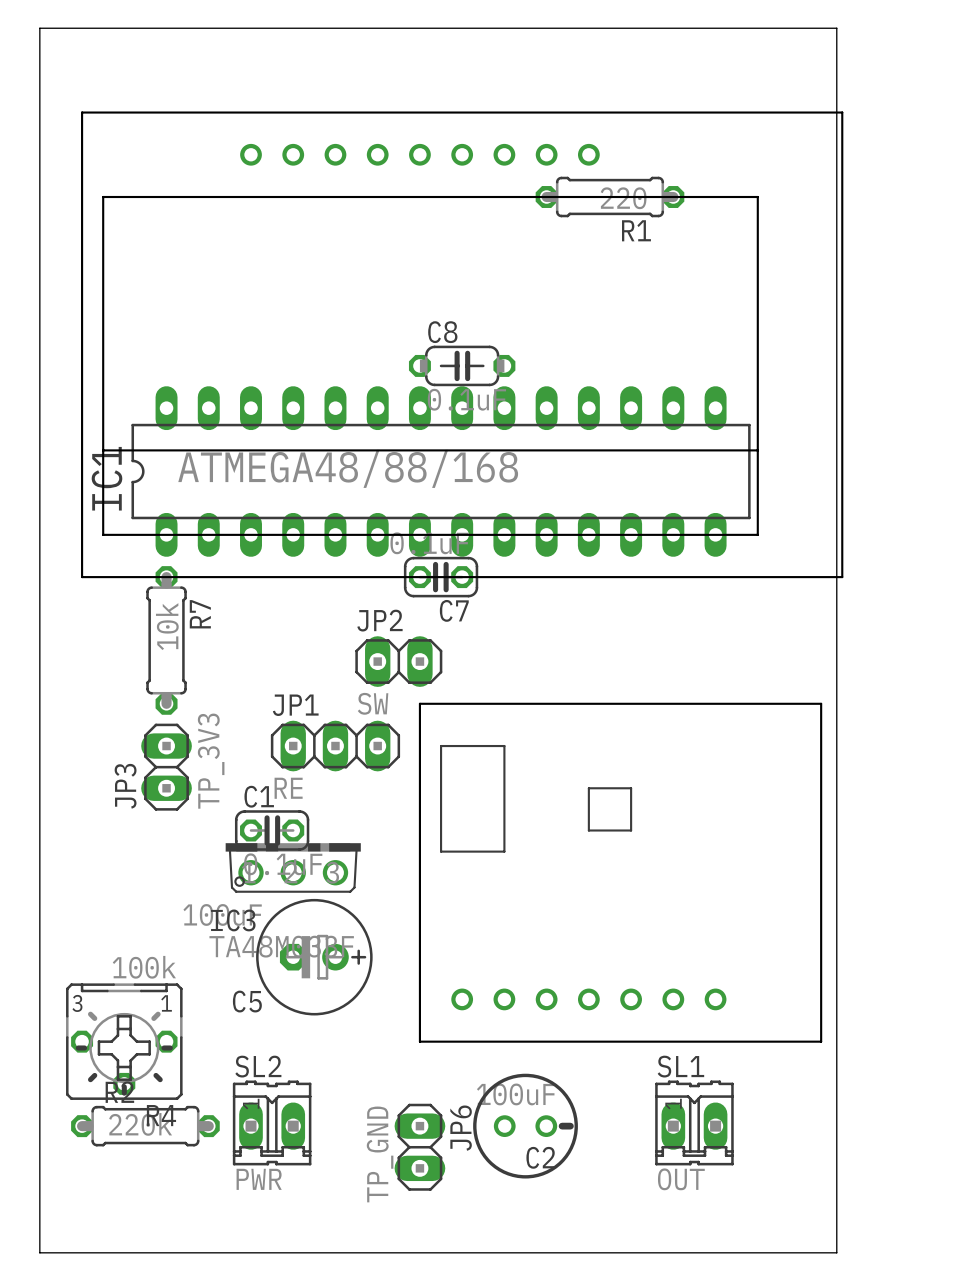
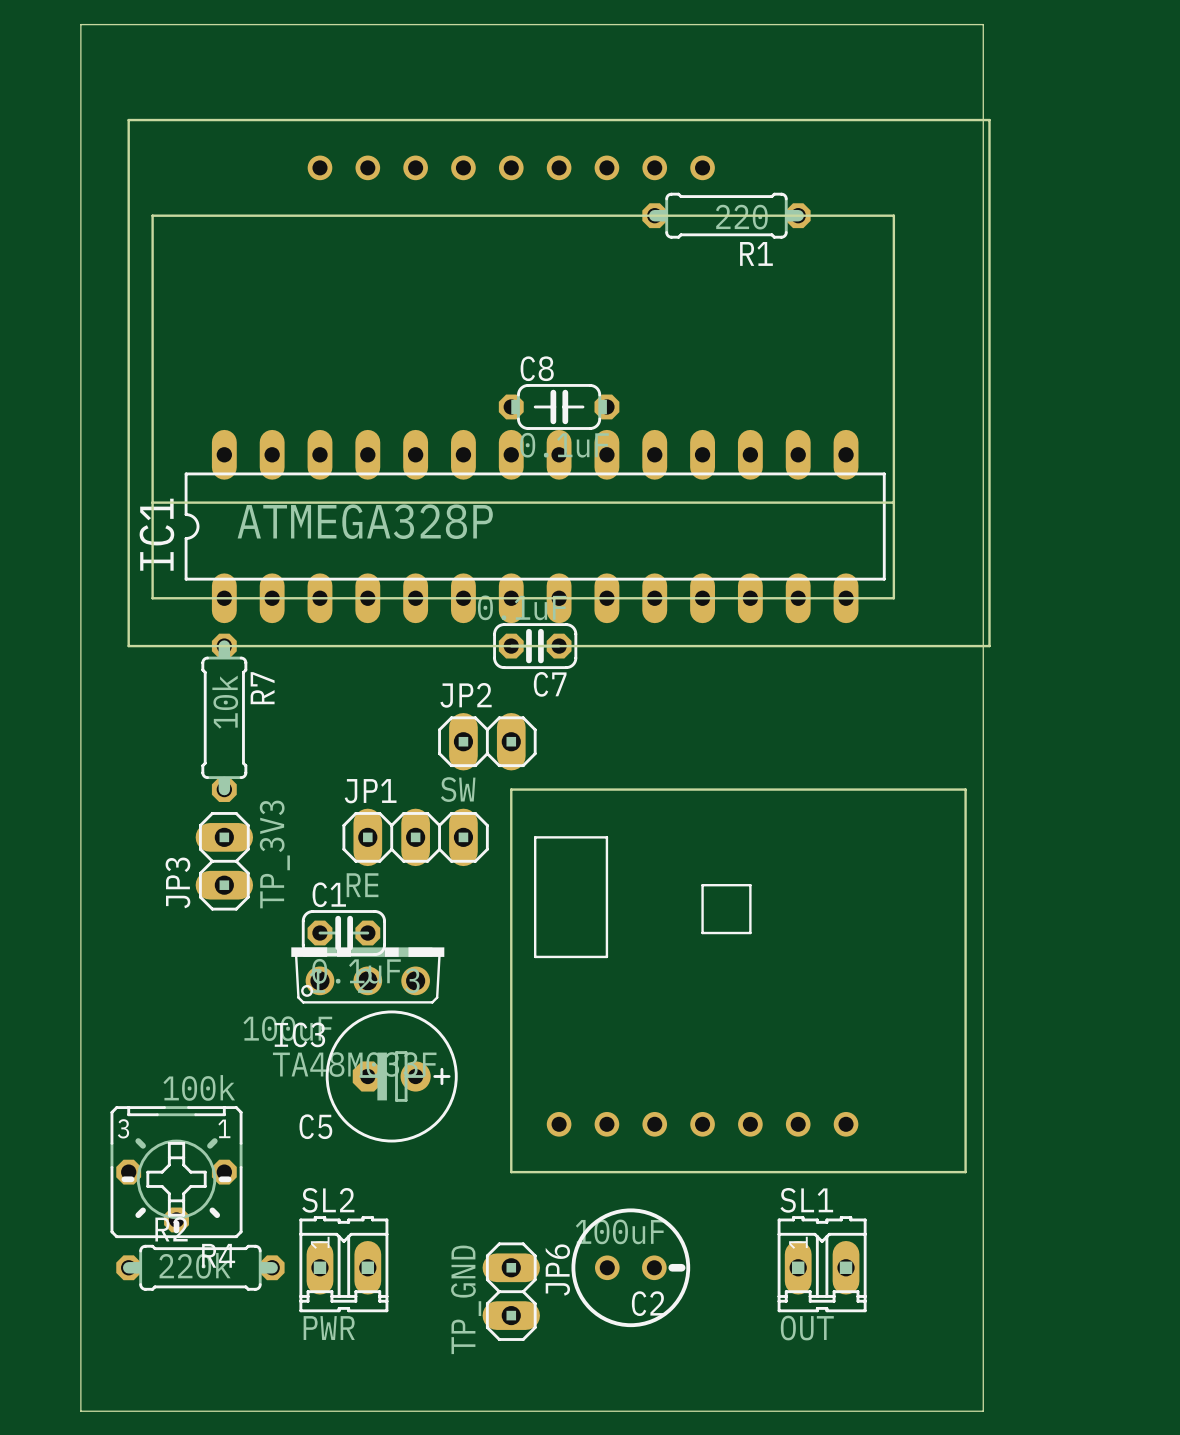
IC1 value: ATMEGA48/88/168 (348, 468) -> ATMEGA328P (365, 521)

